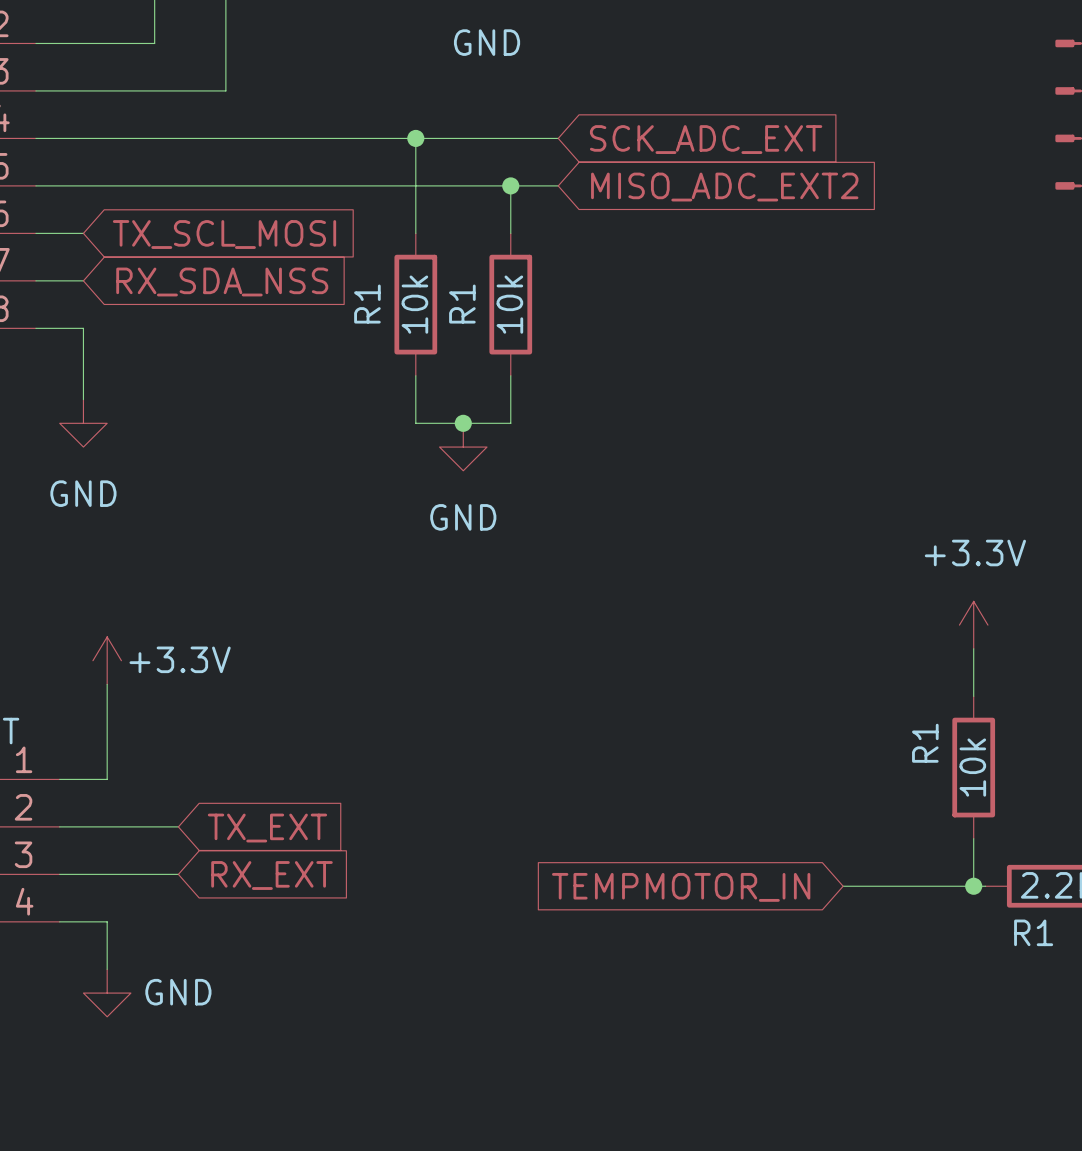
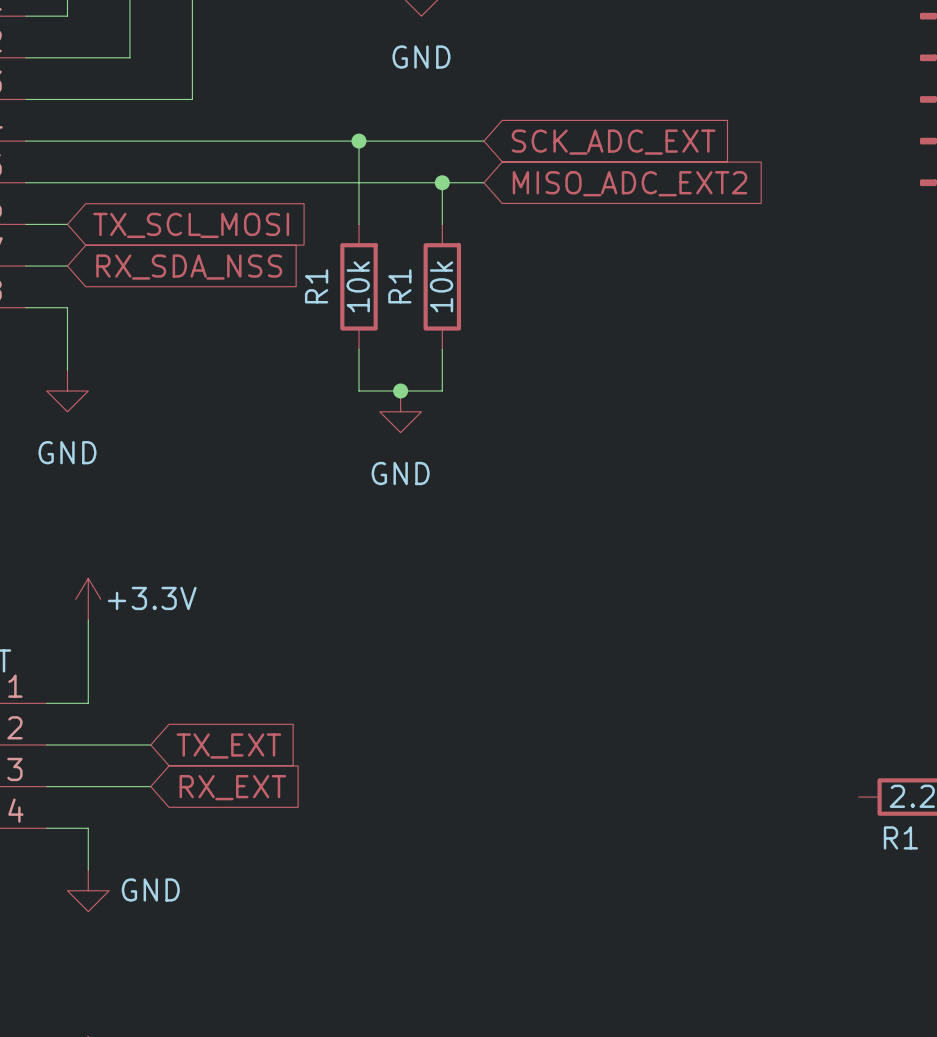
power symbol: +3.3V (973, 625) -> none
wire: (973, 648) (973, 696) -> none
R1: 10k (973, 767) -> none
wire: (973, 838) (973, 886) -> none
wire: (843, 886) (985, 886) -> none
junction: (973, 886) -> none
global label: TEMPMOTOR_IN (681, 887) -> none

